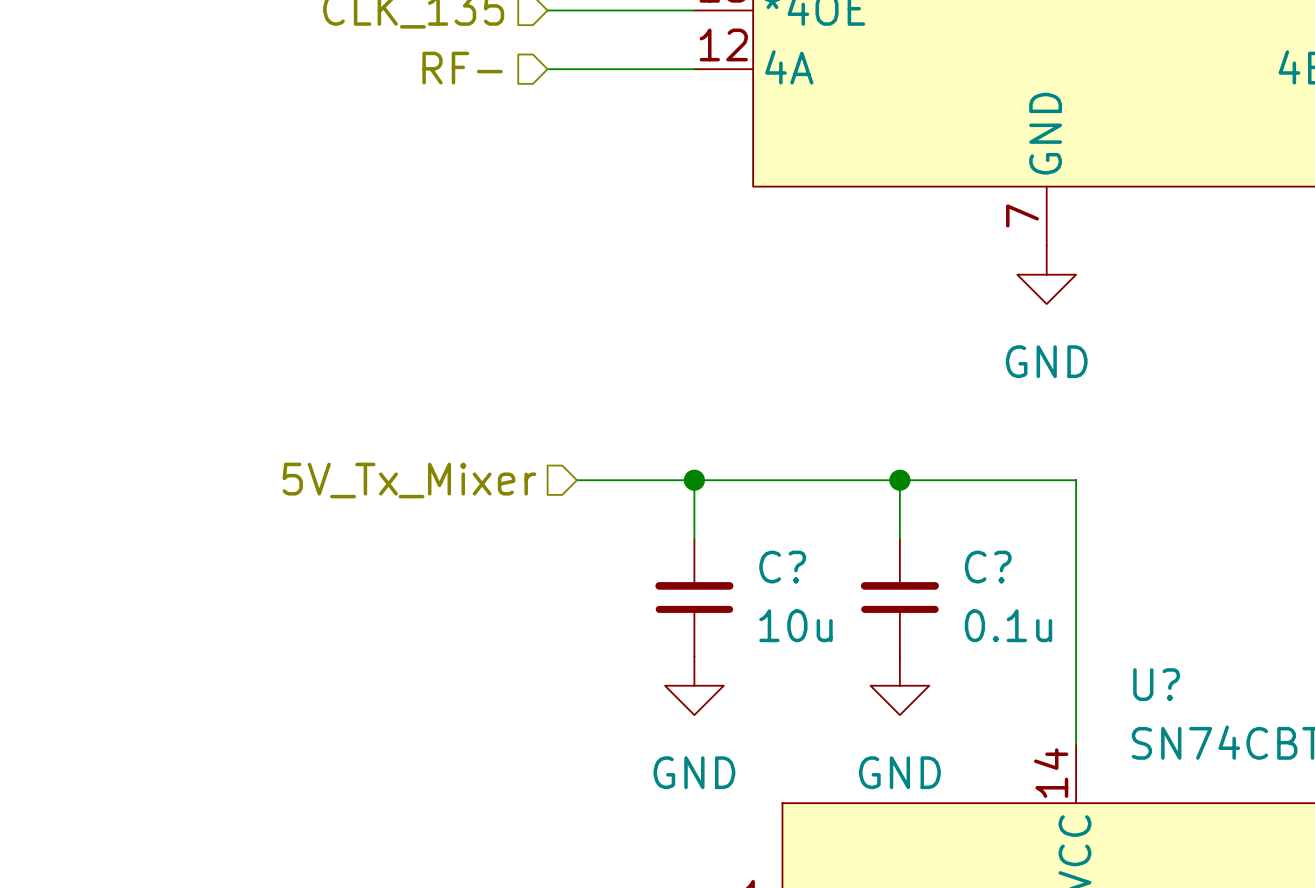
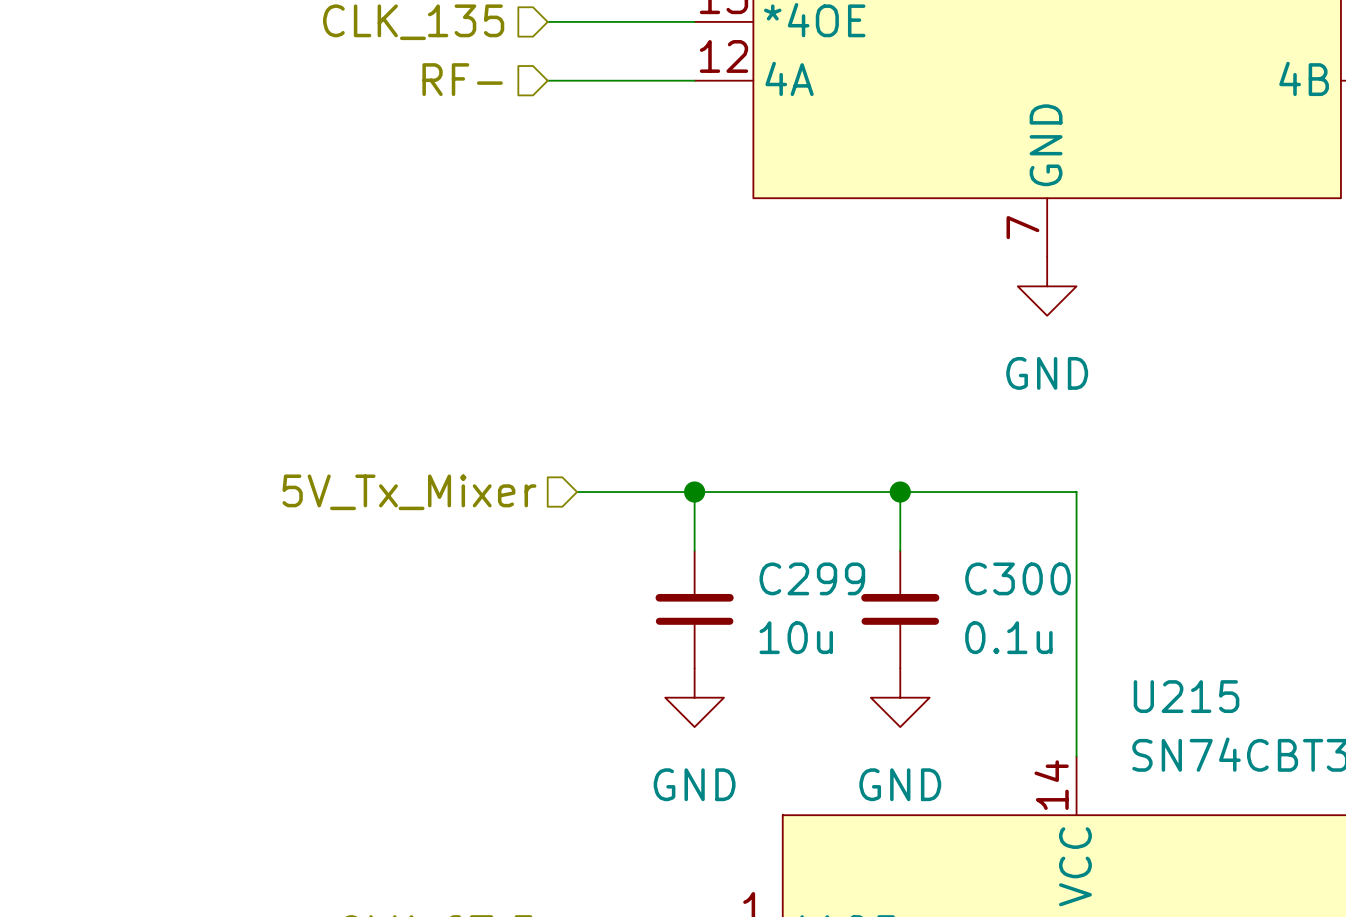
C? name: C? (782, 567) -> C299 (812, 578)
C? name: C? (988, 567) -> C300 (1018, 578)
U? name: U? (1156, 684) -> U215 (1186, 696)

